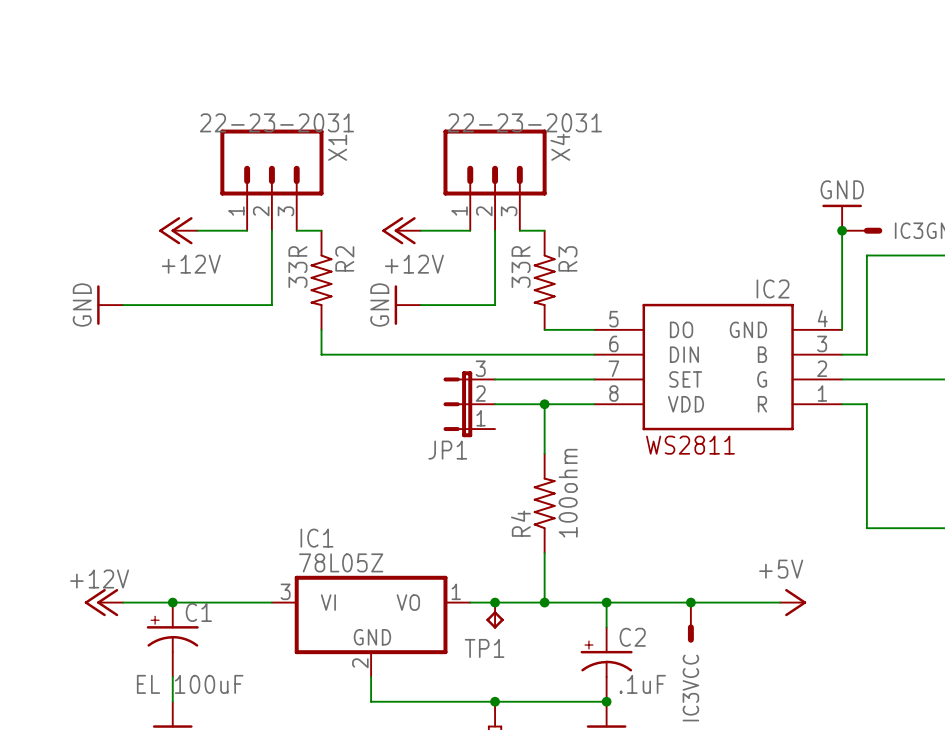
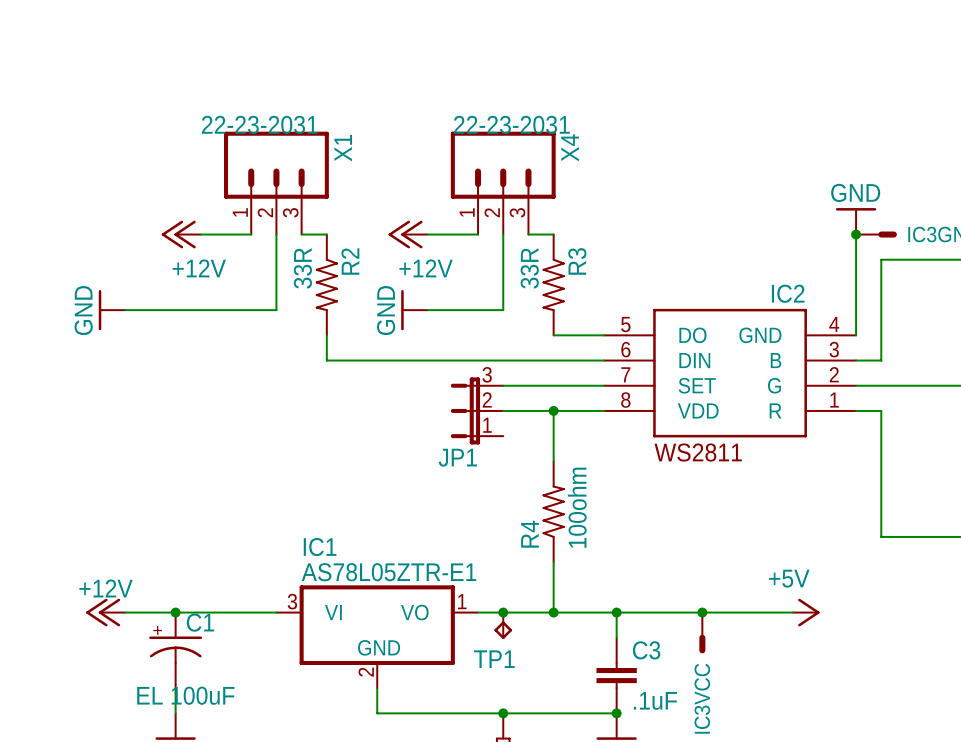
IC1 value: 78L05Z (341, 562) -> AS78L05ZTR-E1 (388, 572)
C2: .1uF (606, 664) -> none
C3: none -> .1uF (616, 675)

